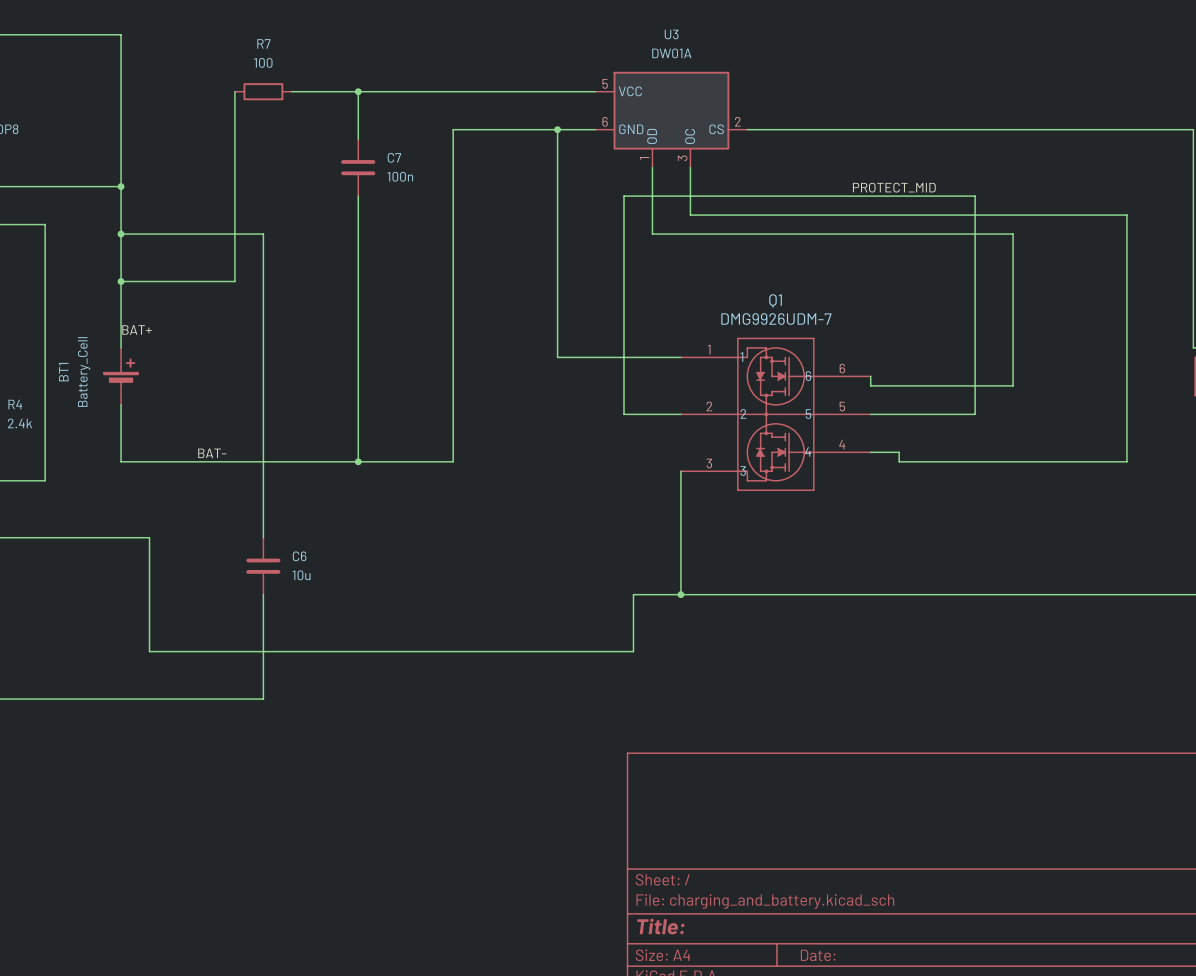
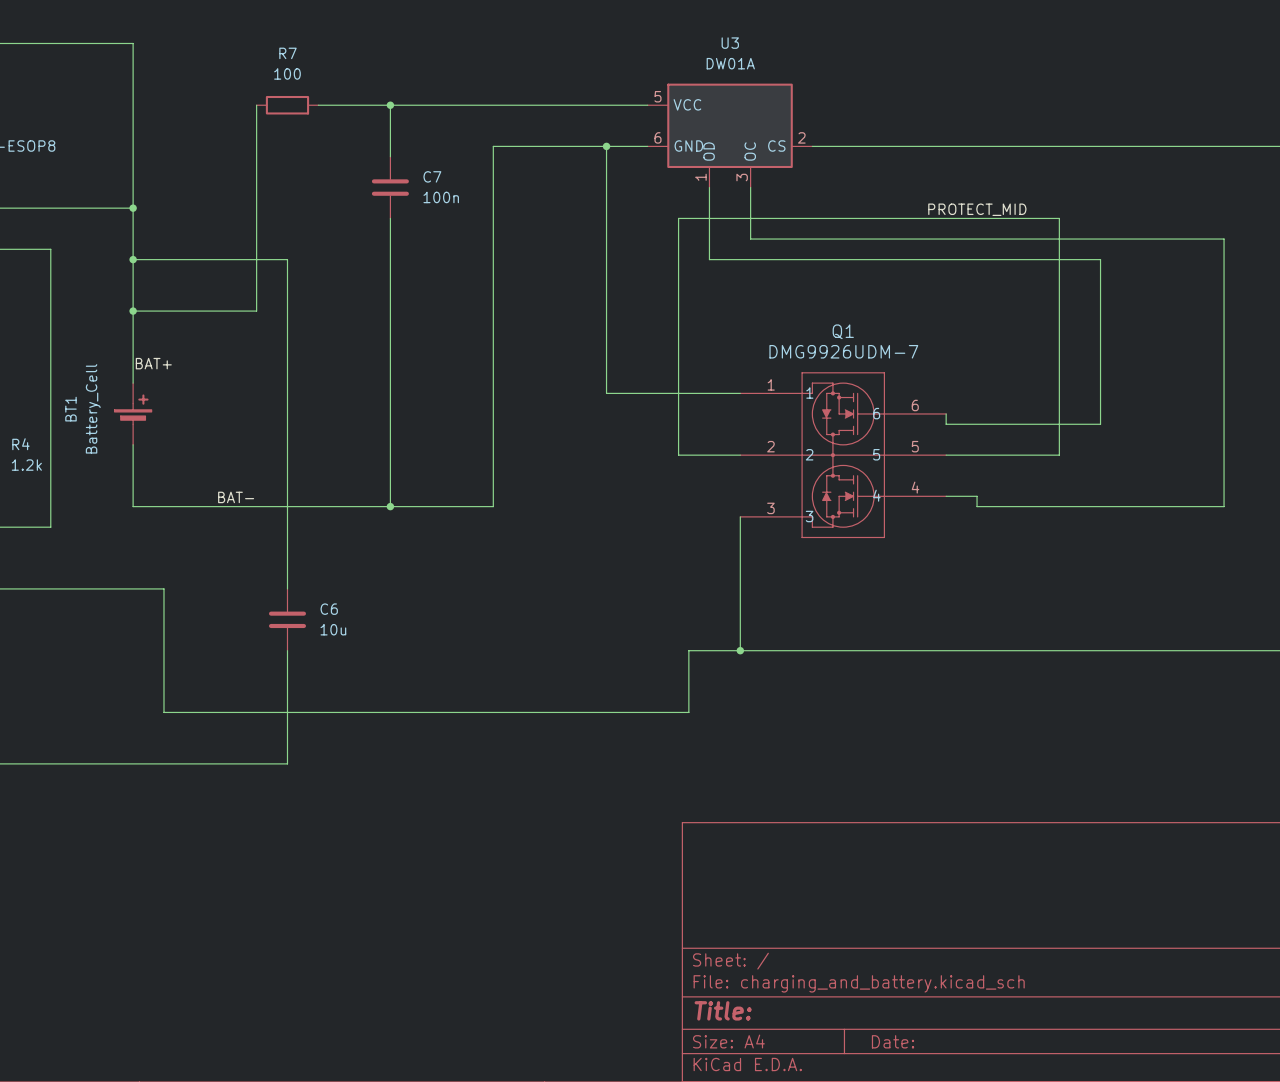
R4 value: 2.4k (20, 423) -> 1.2k (26, 465)

